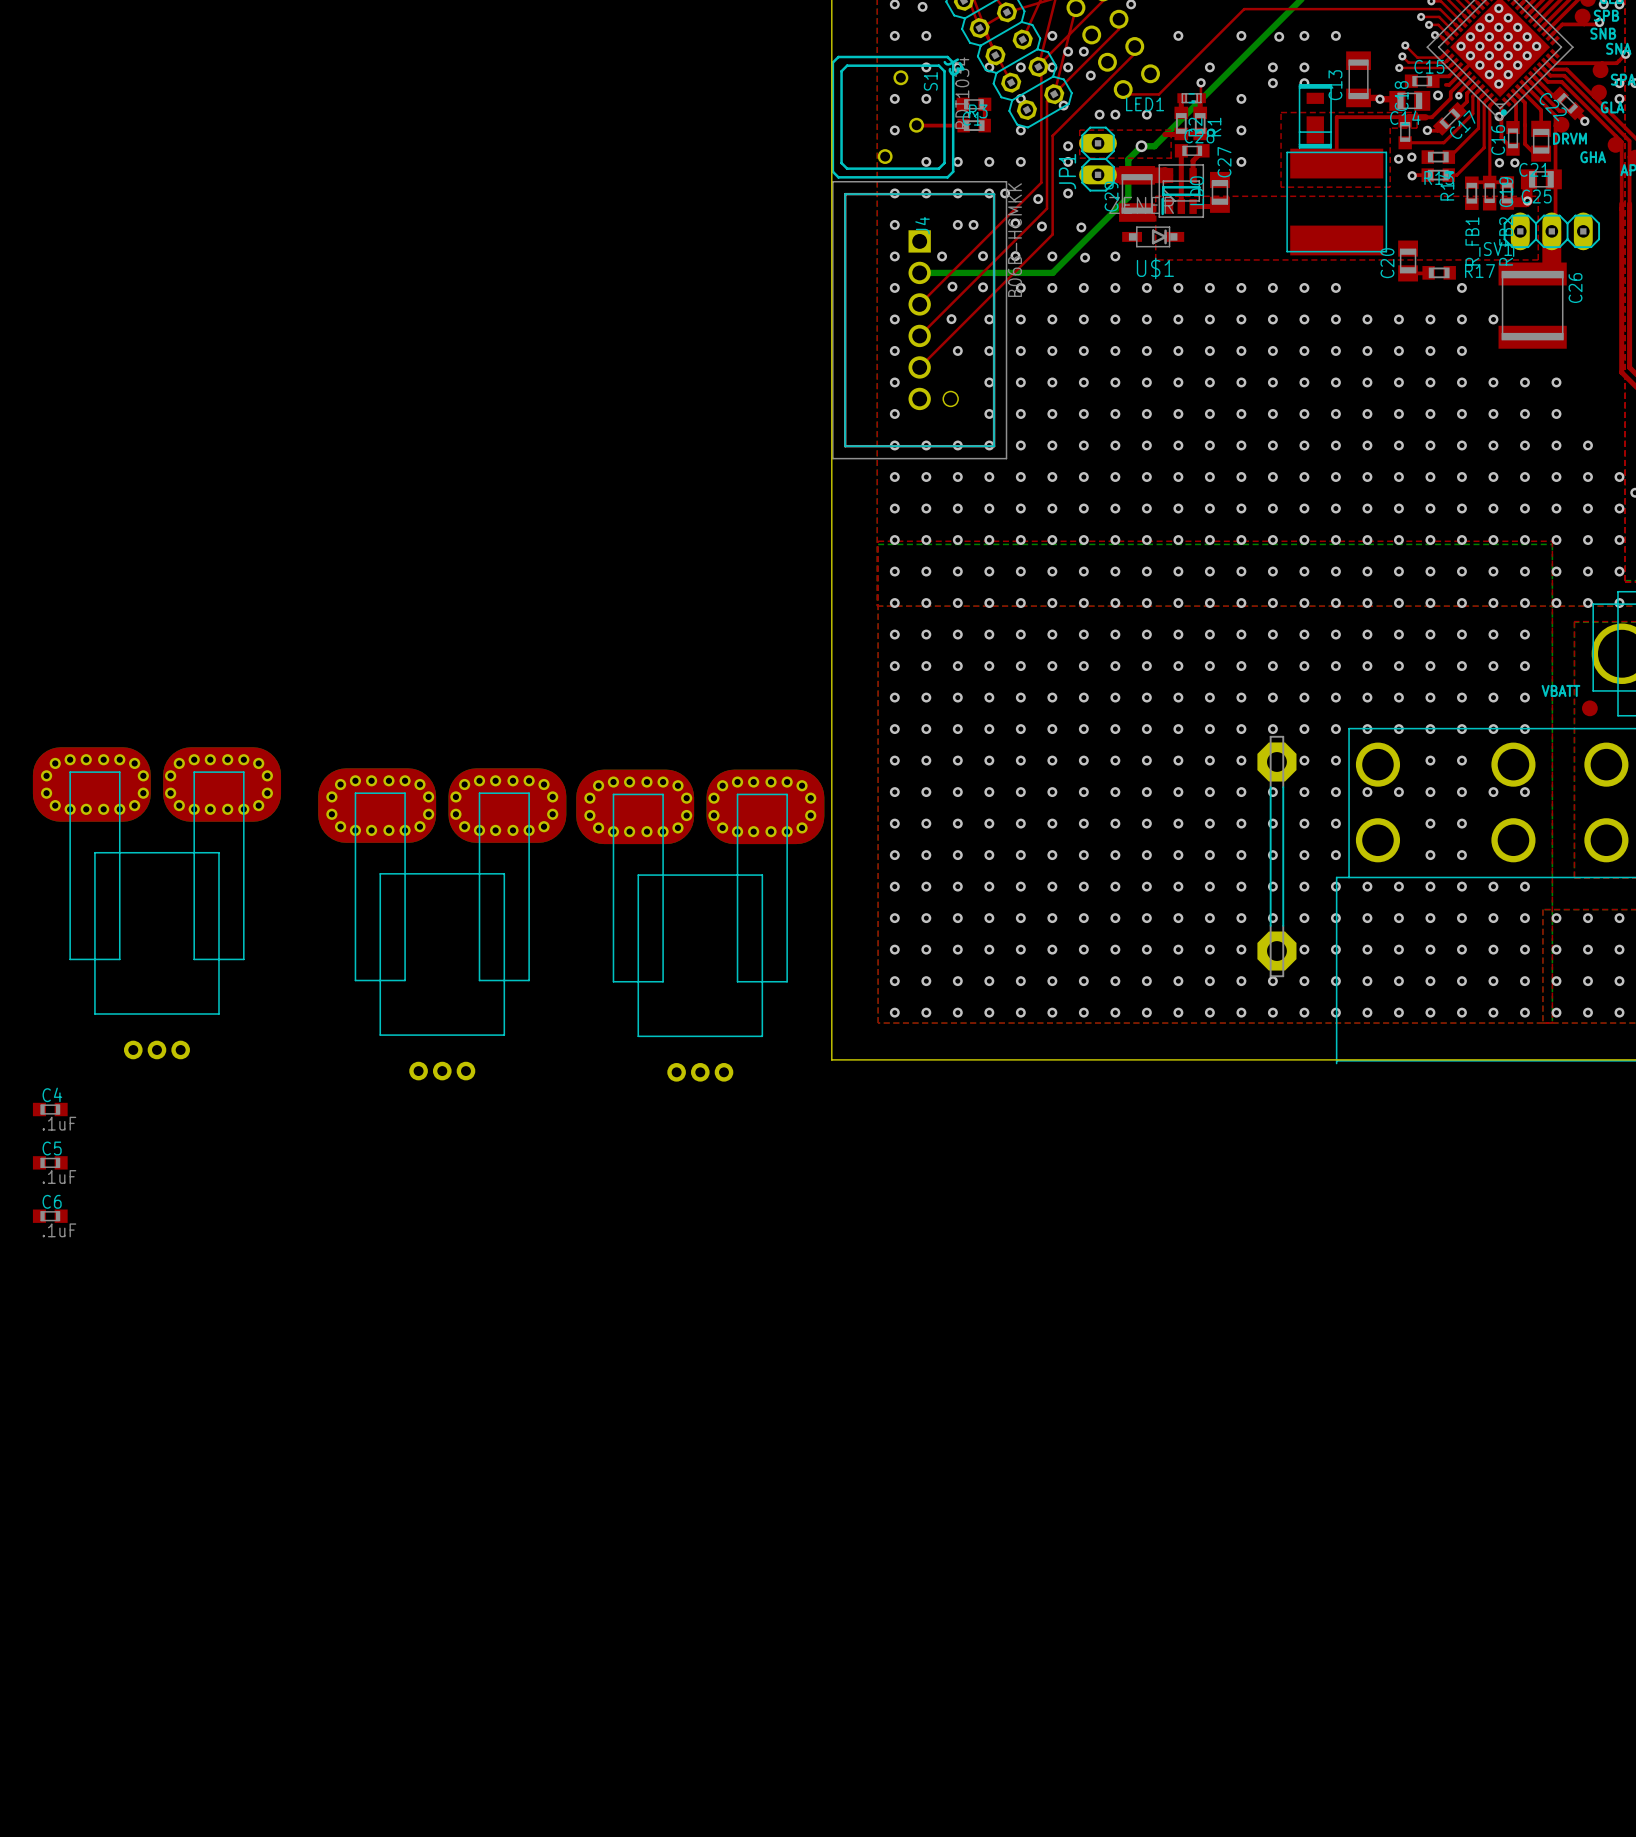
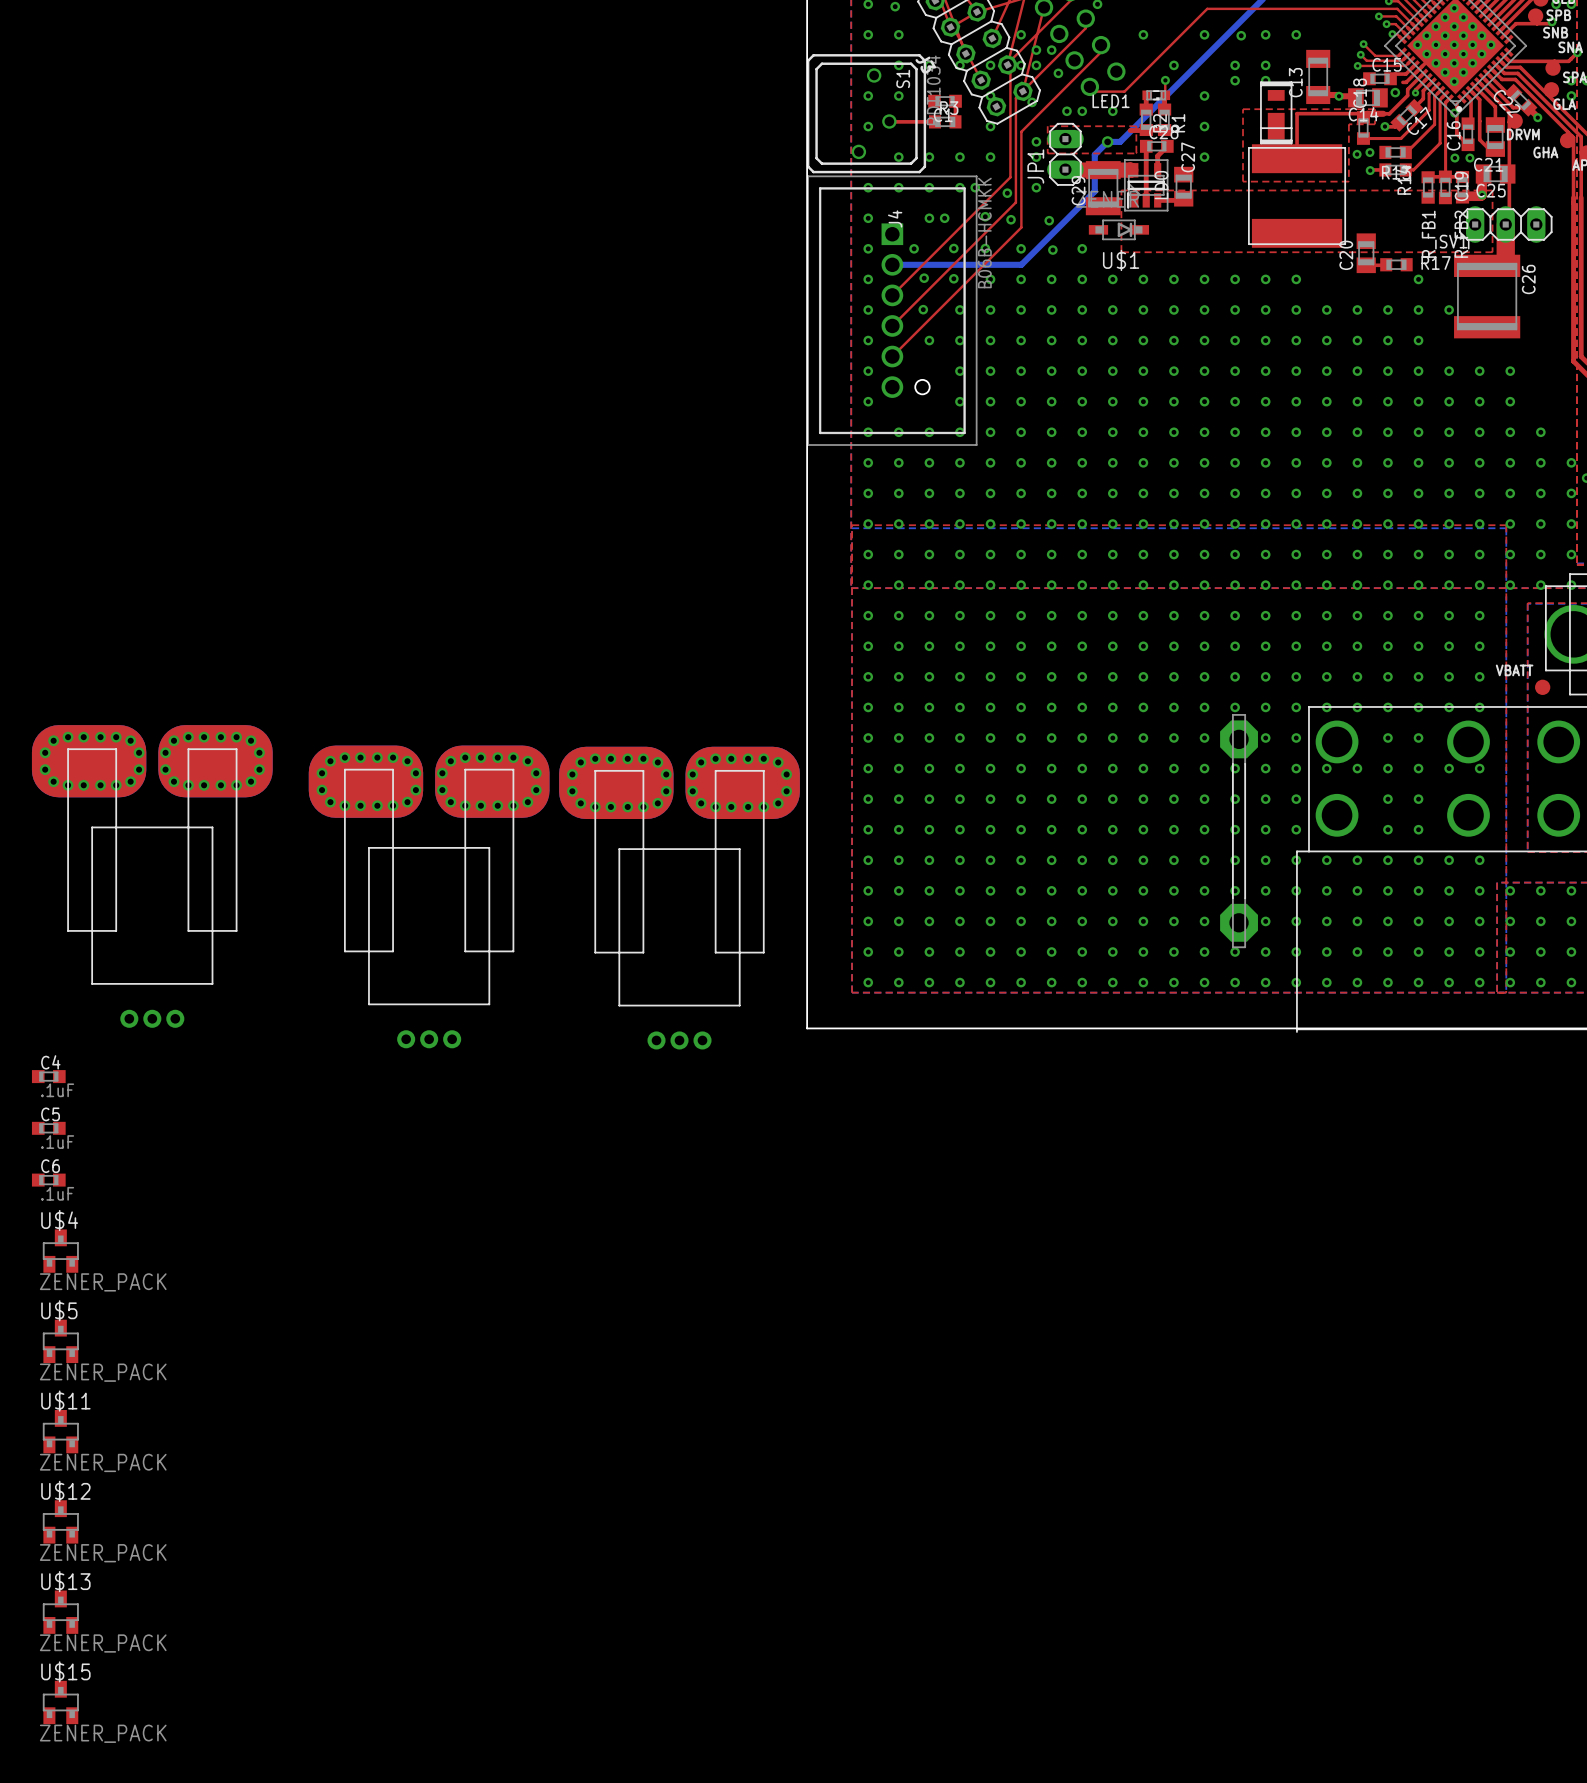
U$4: none -> ZENER_PACK (60, 1251)
U$5: none -> ZENER_PACK (60, 1341)
U$11: none -> ZENER_PACK (60, 1431)
U$12: none -> ZENER_PACK (60, 1521)
U$13: none -> ZENER_PACK (60, 1612)
U$15: none -> ZENER_PACK (60, 1702)

